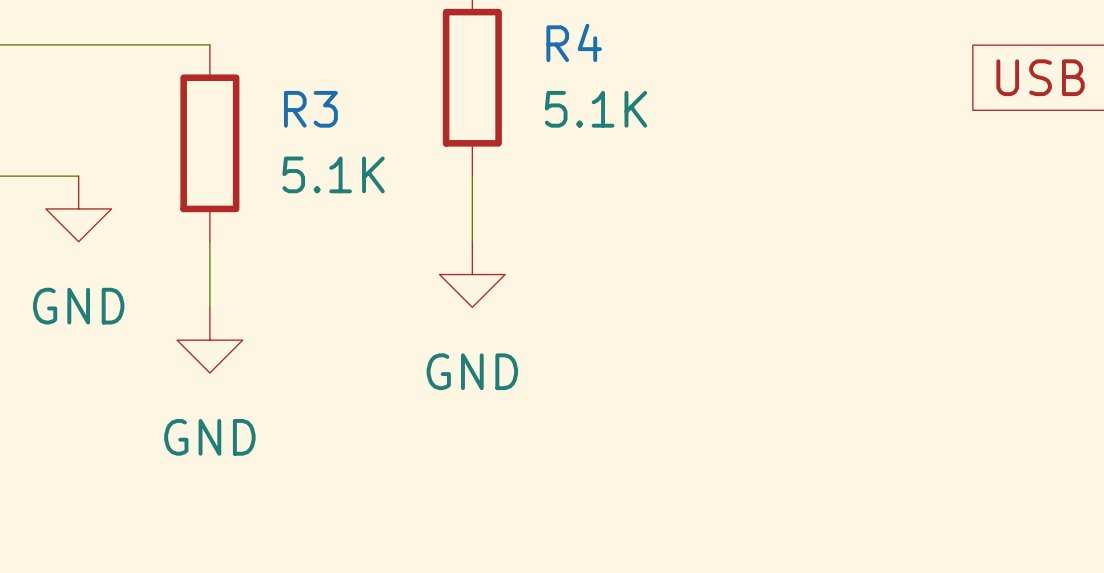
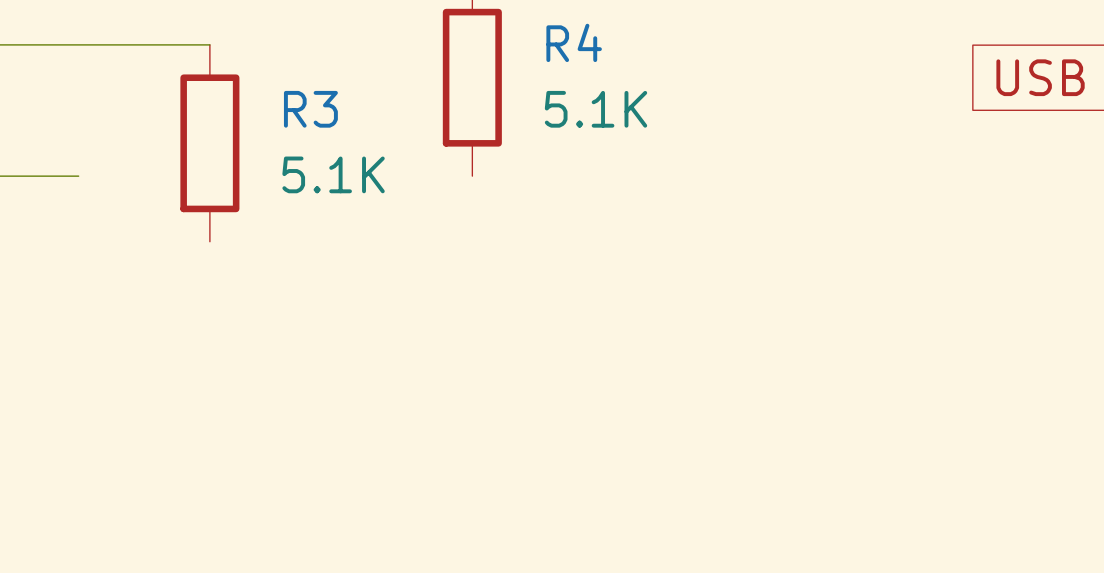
wire: (472, 176) (472, 241) -> none
power symbol: GND (78, 208) -> none
wire: (209, 241) (209, 307) -> none
power symbol: GND (472, 274) -> none
power symbol: GND (209, 340) -> none

